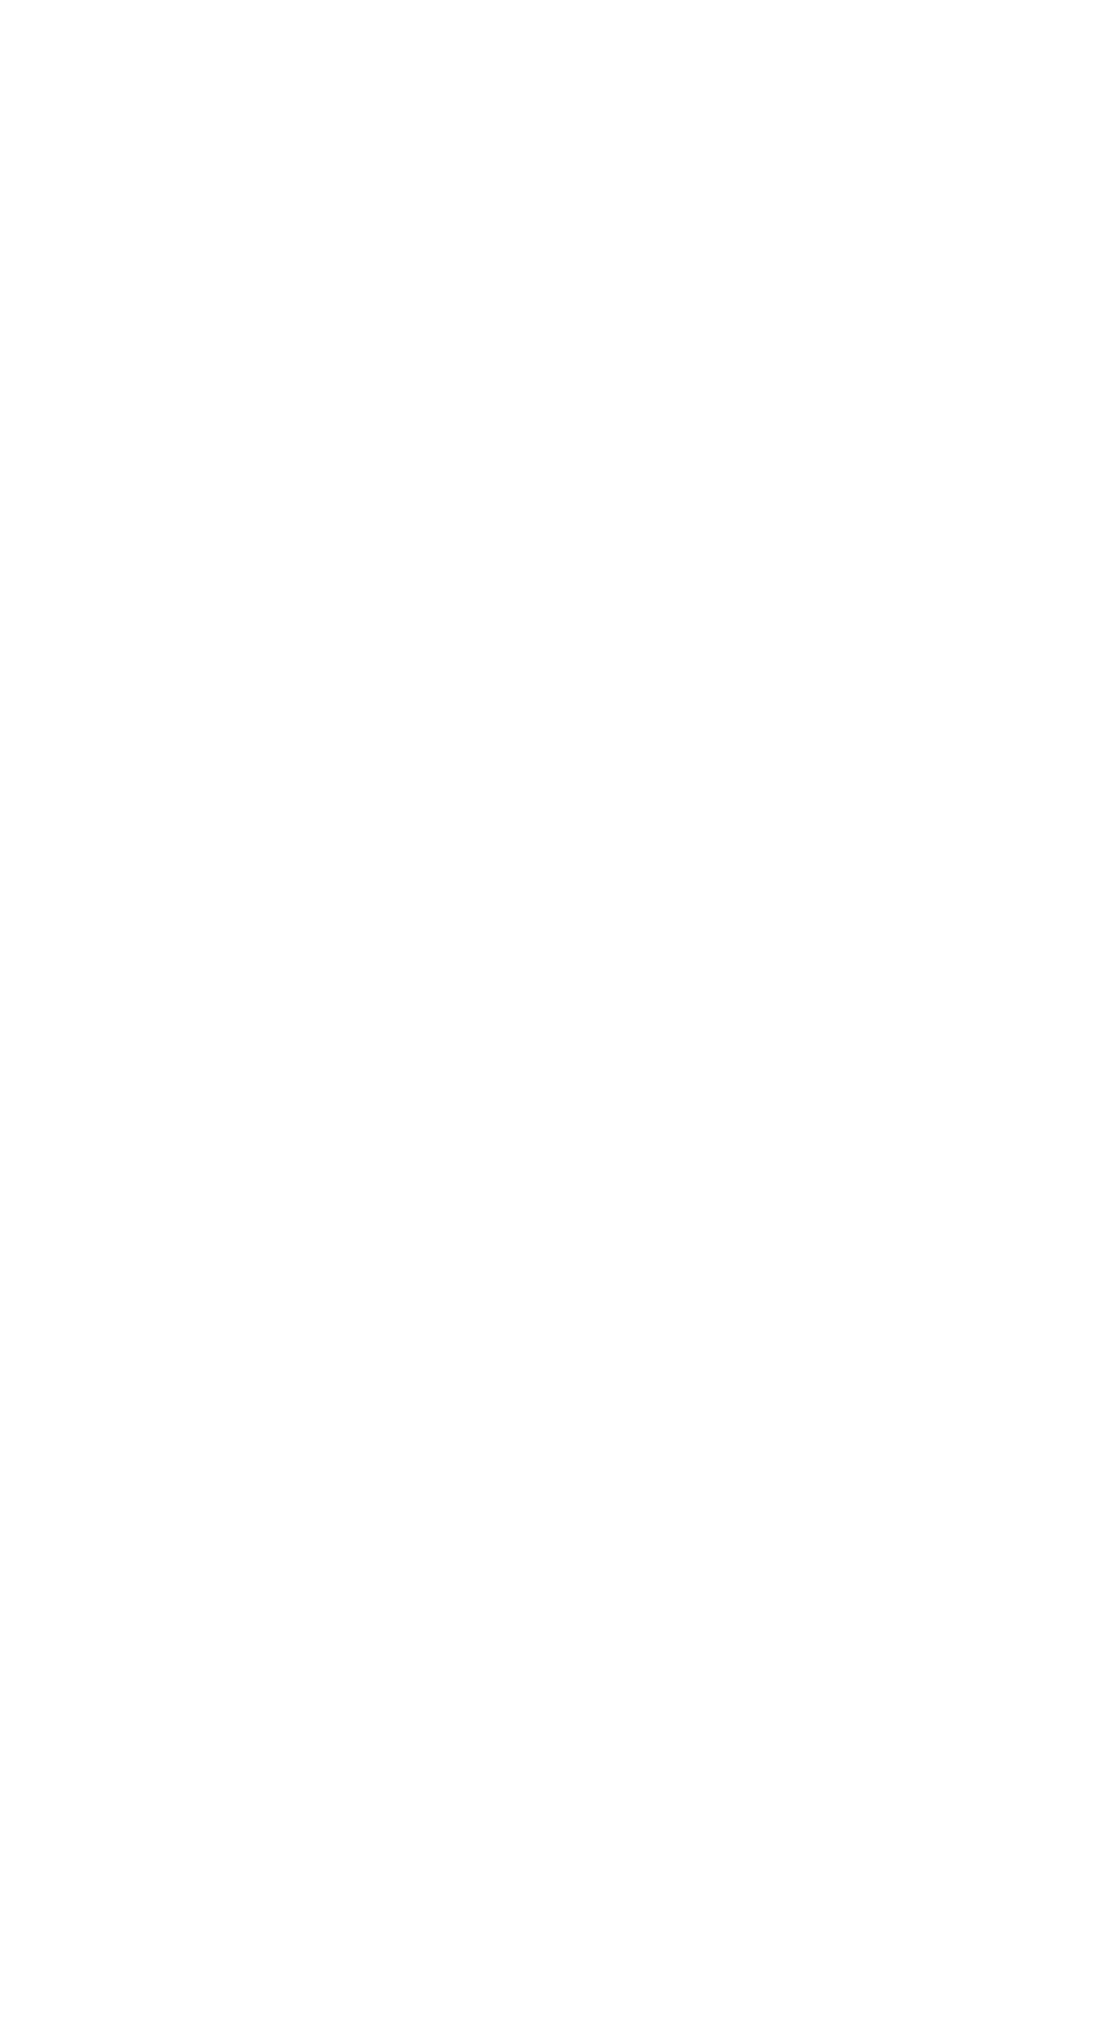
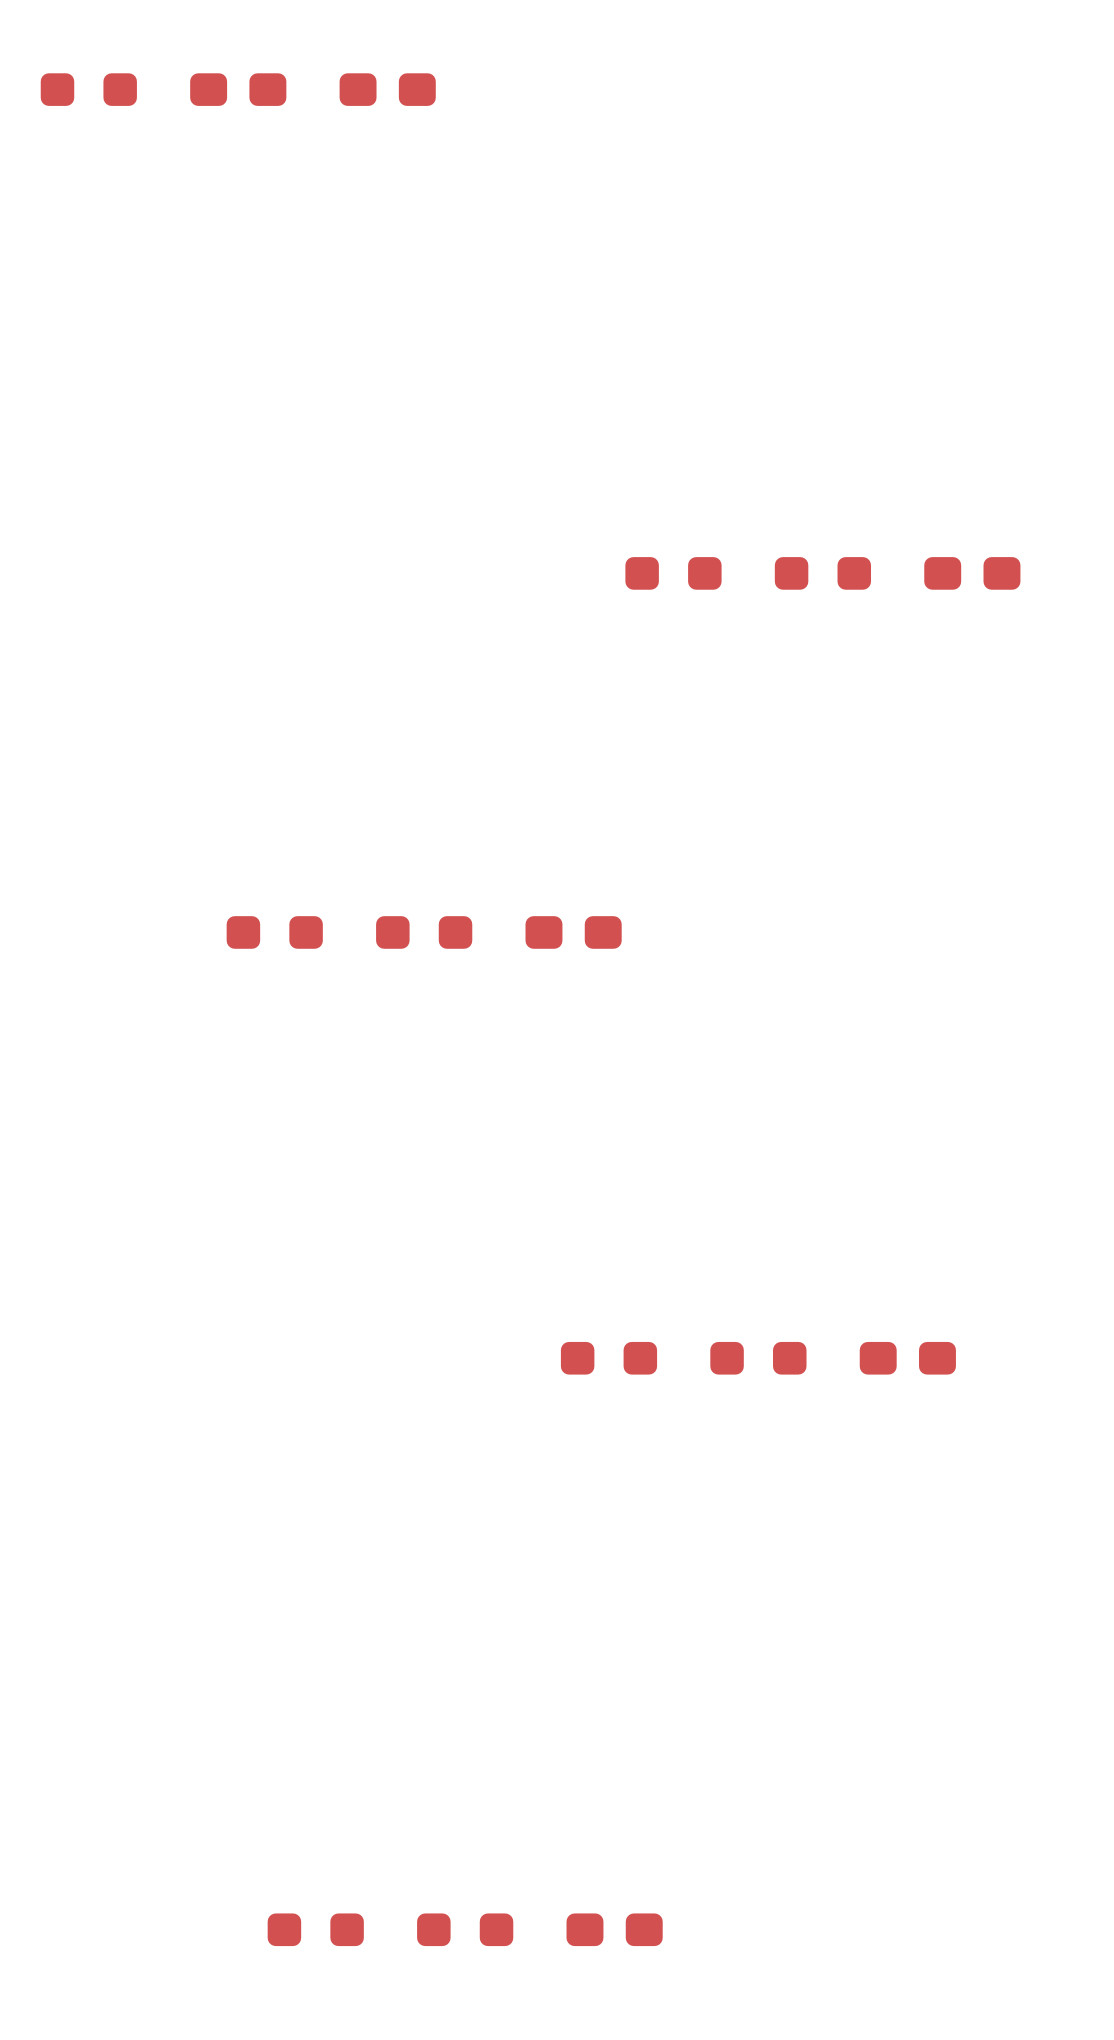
part: none -> (88, 89)
part: none -> (238, 89)
part: none -> (387, 89)
part: none -> (673, 573)
part: none -> (822, 573)
part: none -> (972, 573)
part: none -> (274, 932)
part: none -> (424, 932)
part: none -> (573, 932)
part: none -> (608, 1358)
part: none -> (758, 1358)
part: none -> (907, 1358)
part: none -> (315, 1929)
part: none -> (465, 1929)
part: none -> (614, 1929)

